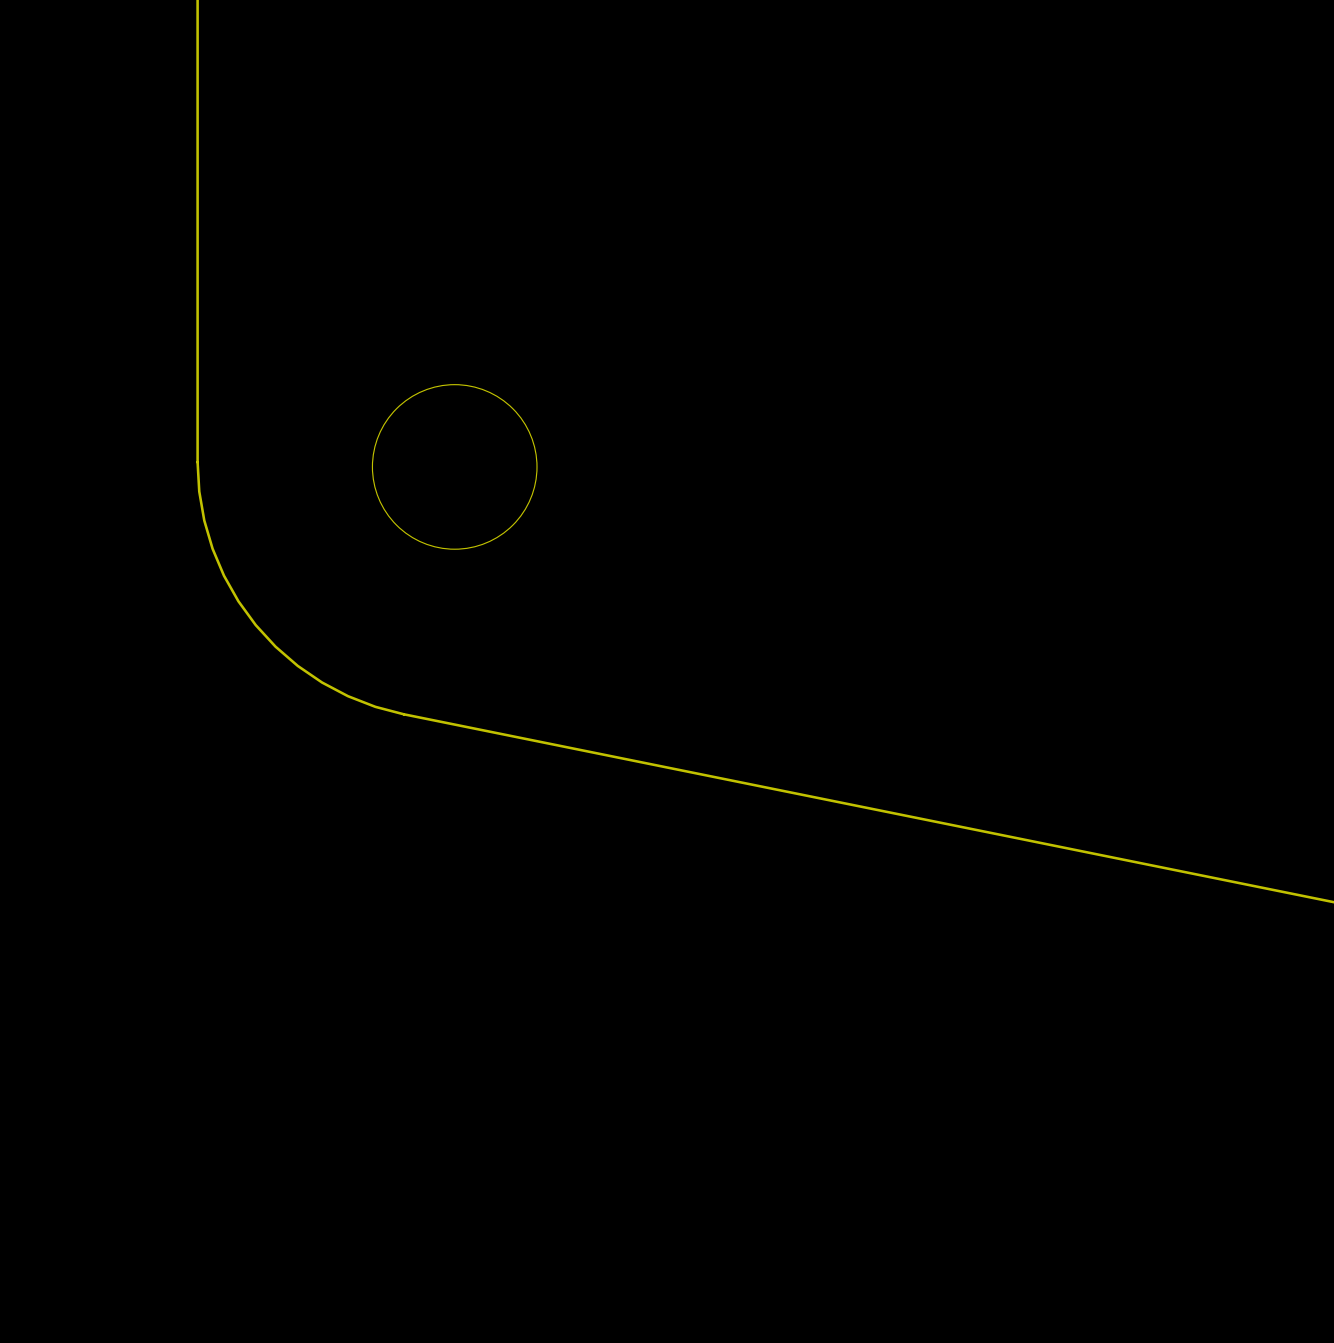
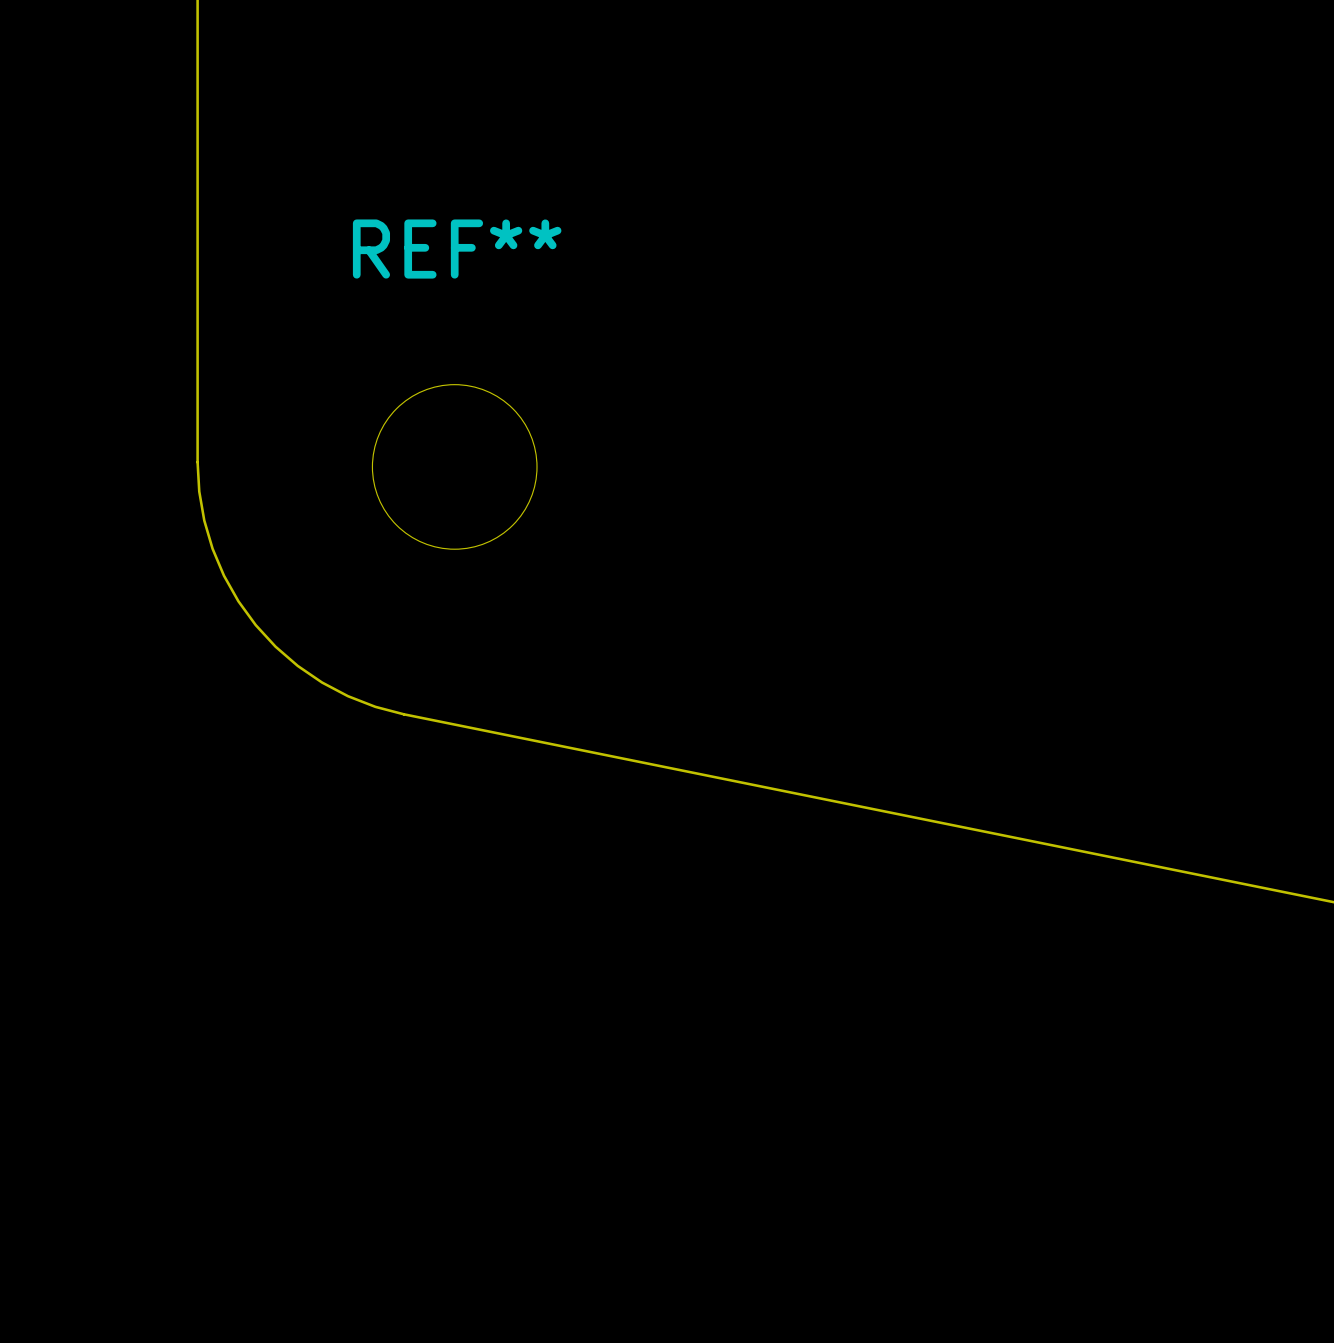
REF** name: none -> REF** (457, 249)

